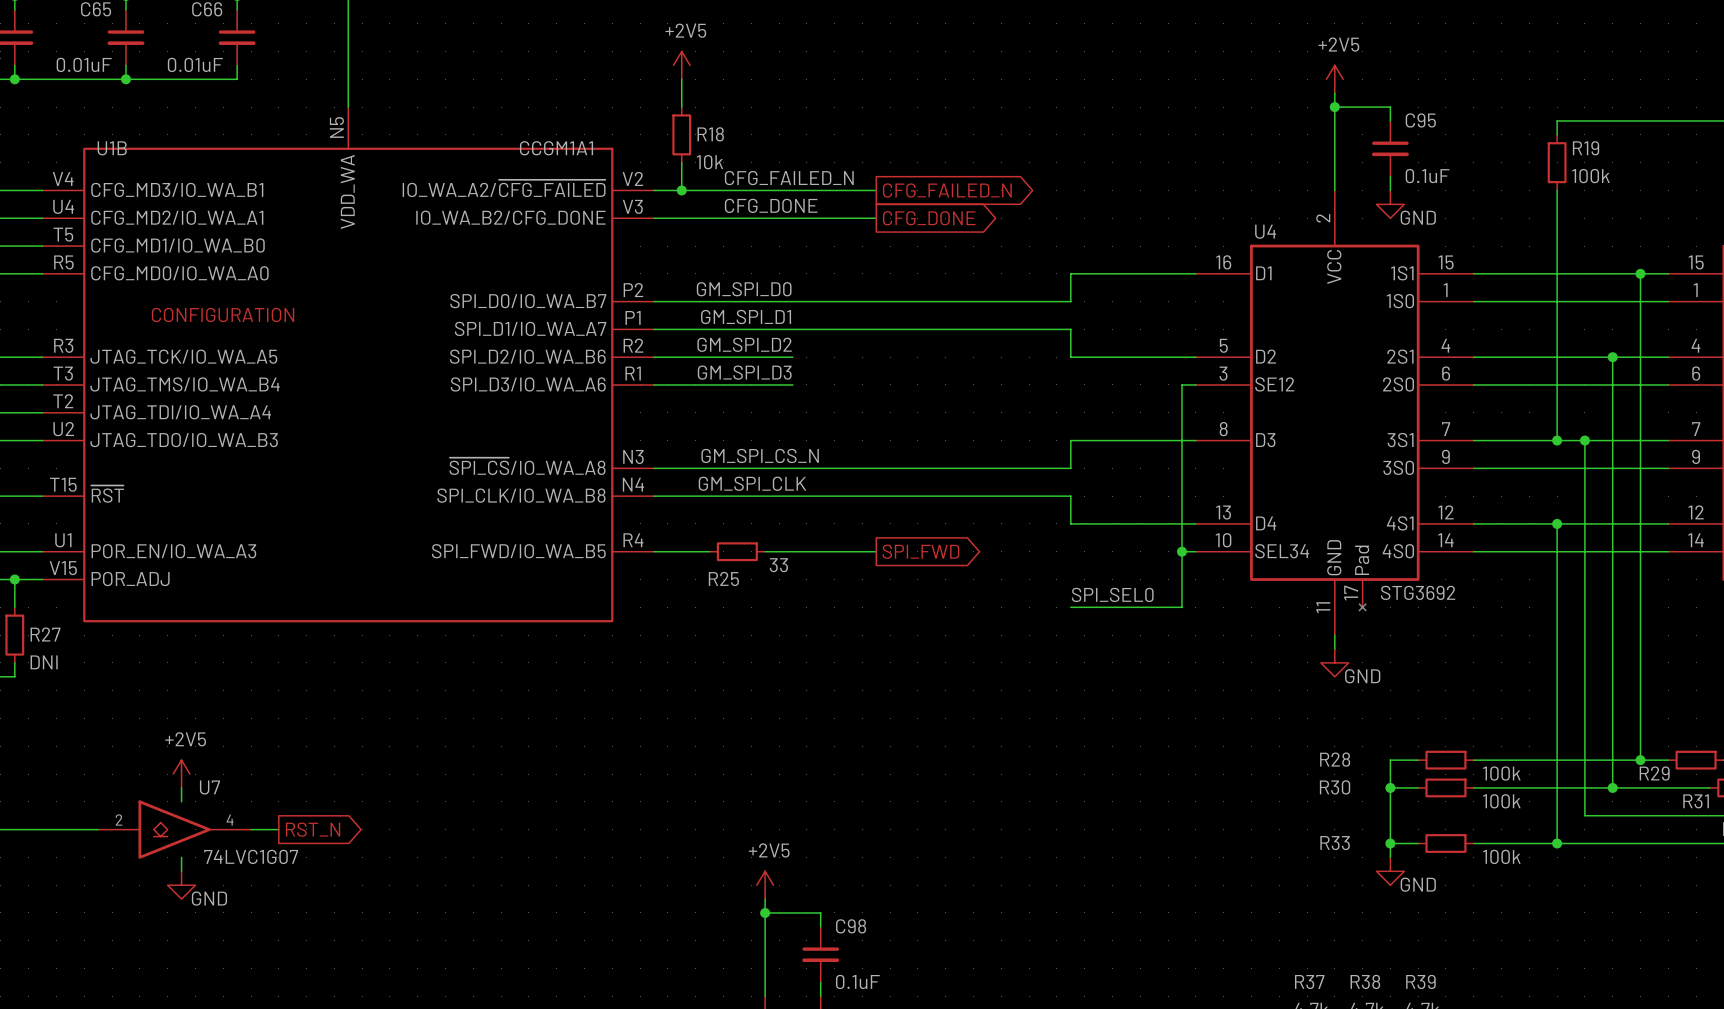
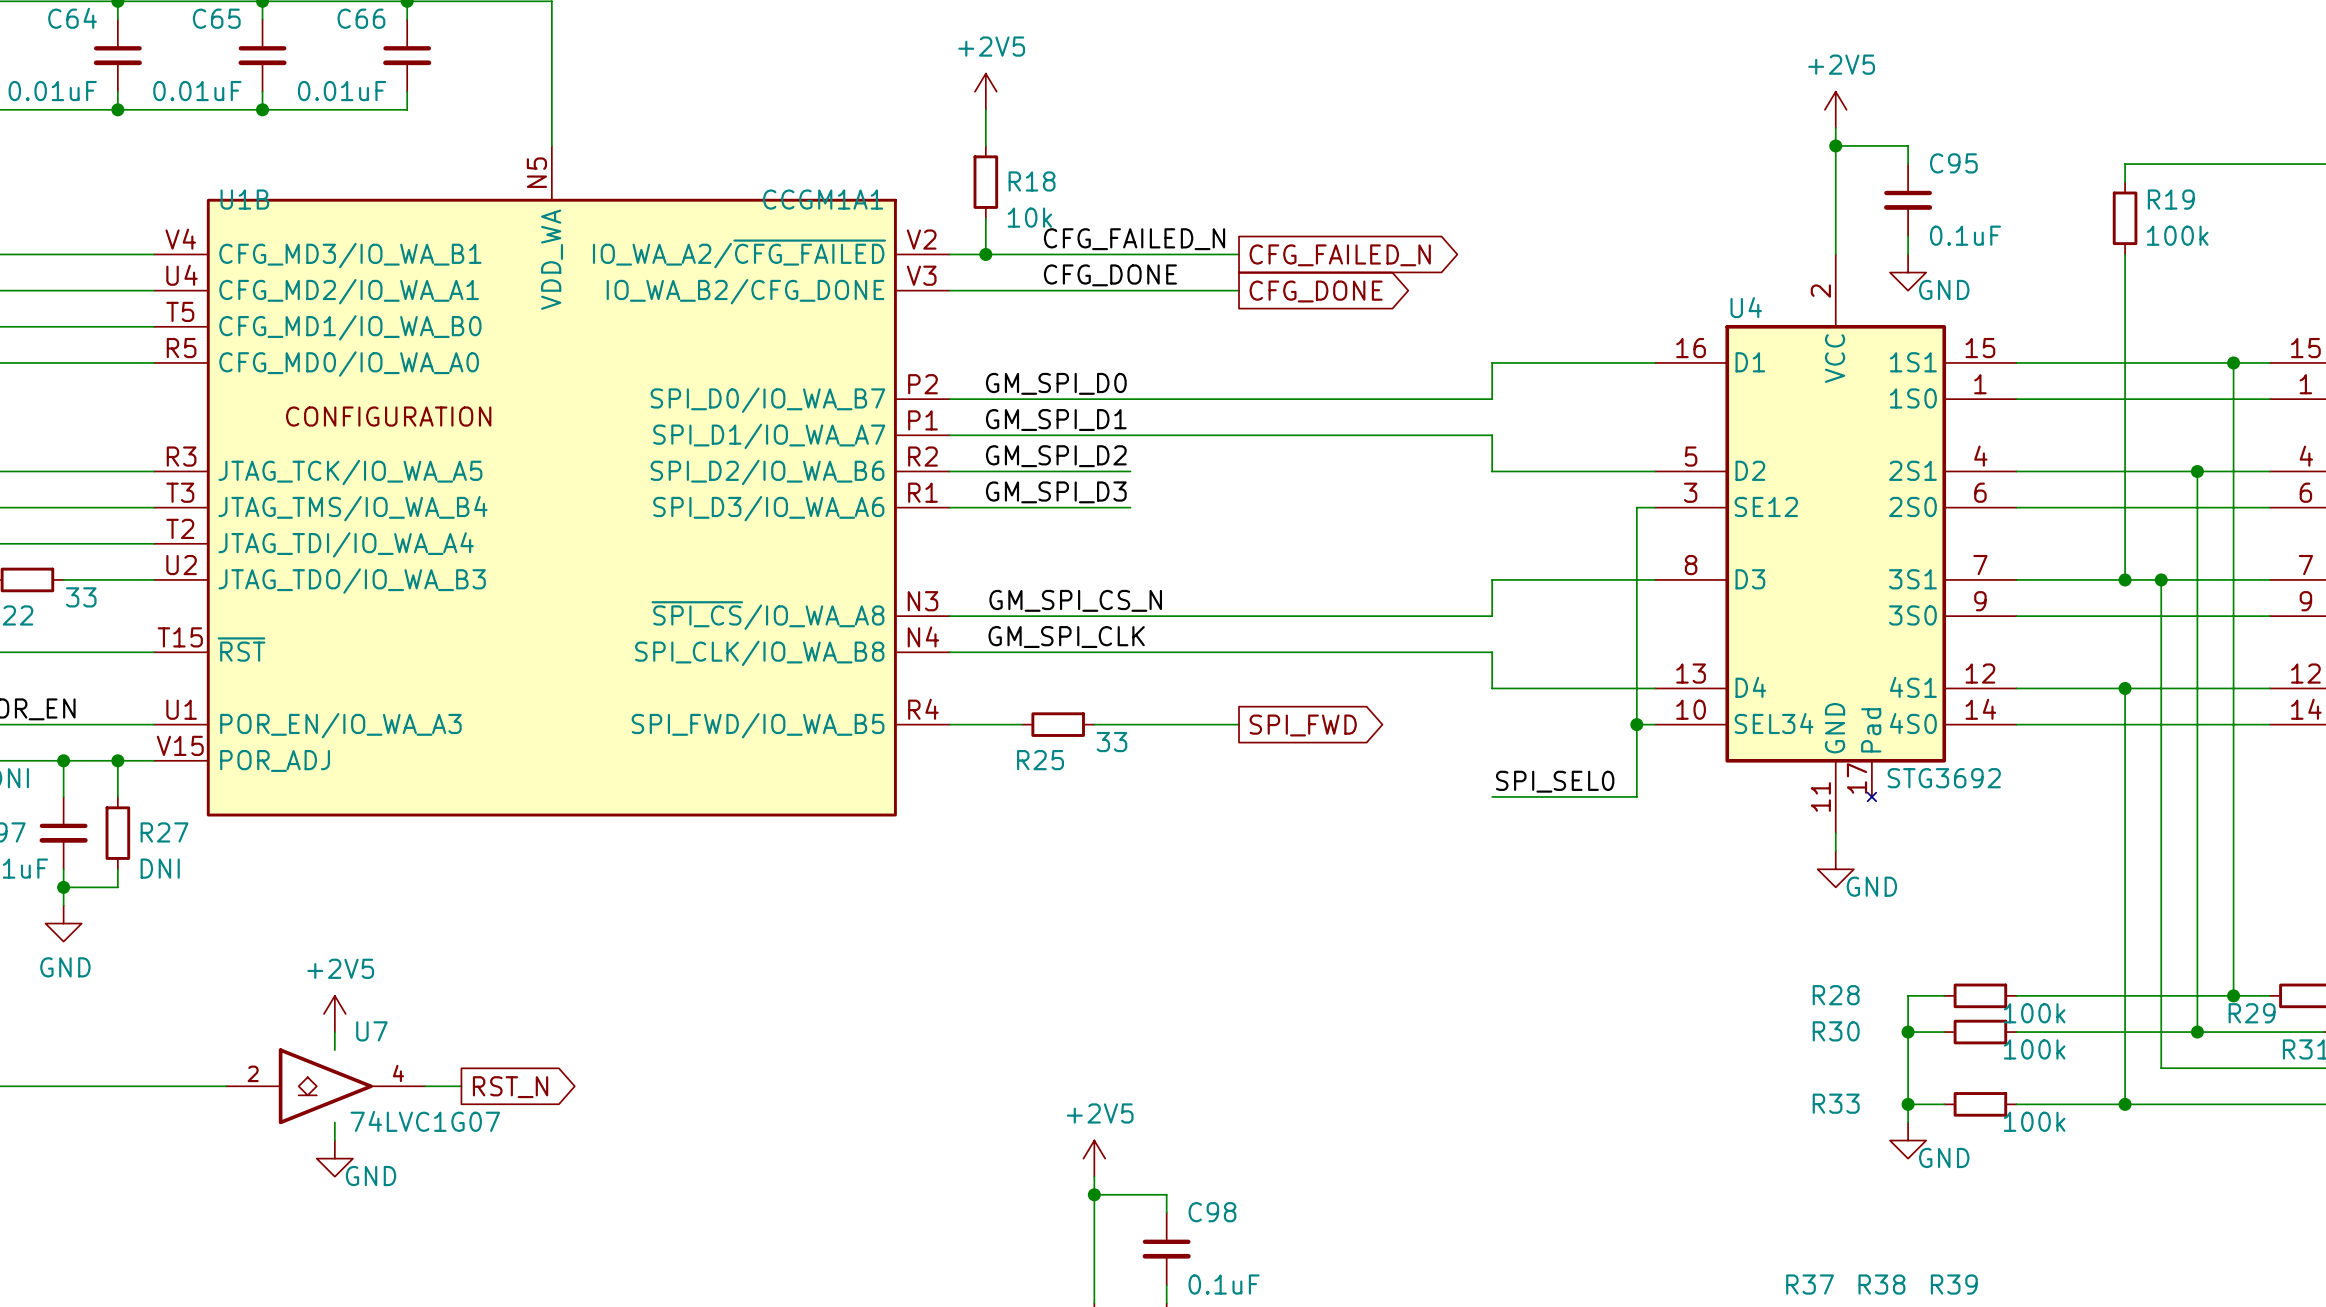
R28 value position: 100k (1501, 773) -> 100k (2034, 1013)
R30 value position: 100k (1501, 801) -> 100k (2034, 1049)
R33 value position: 100k (1501, 856) -> 100k (2034, 1121)

